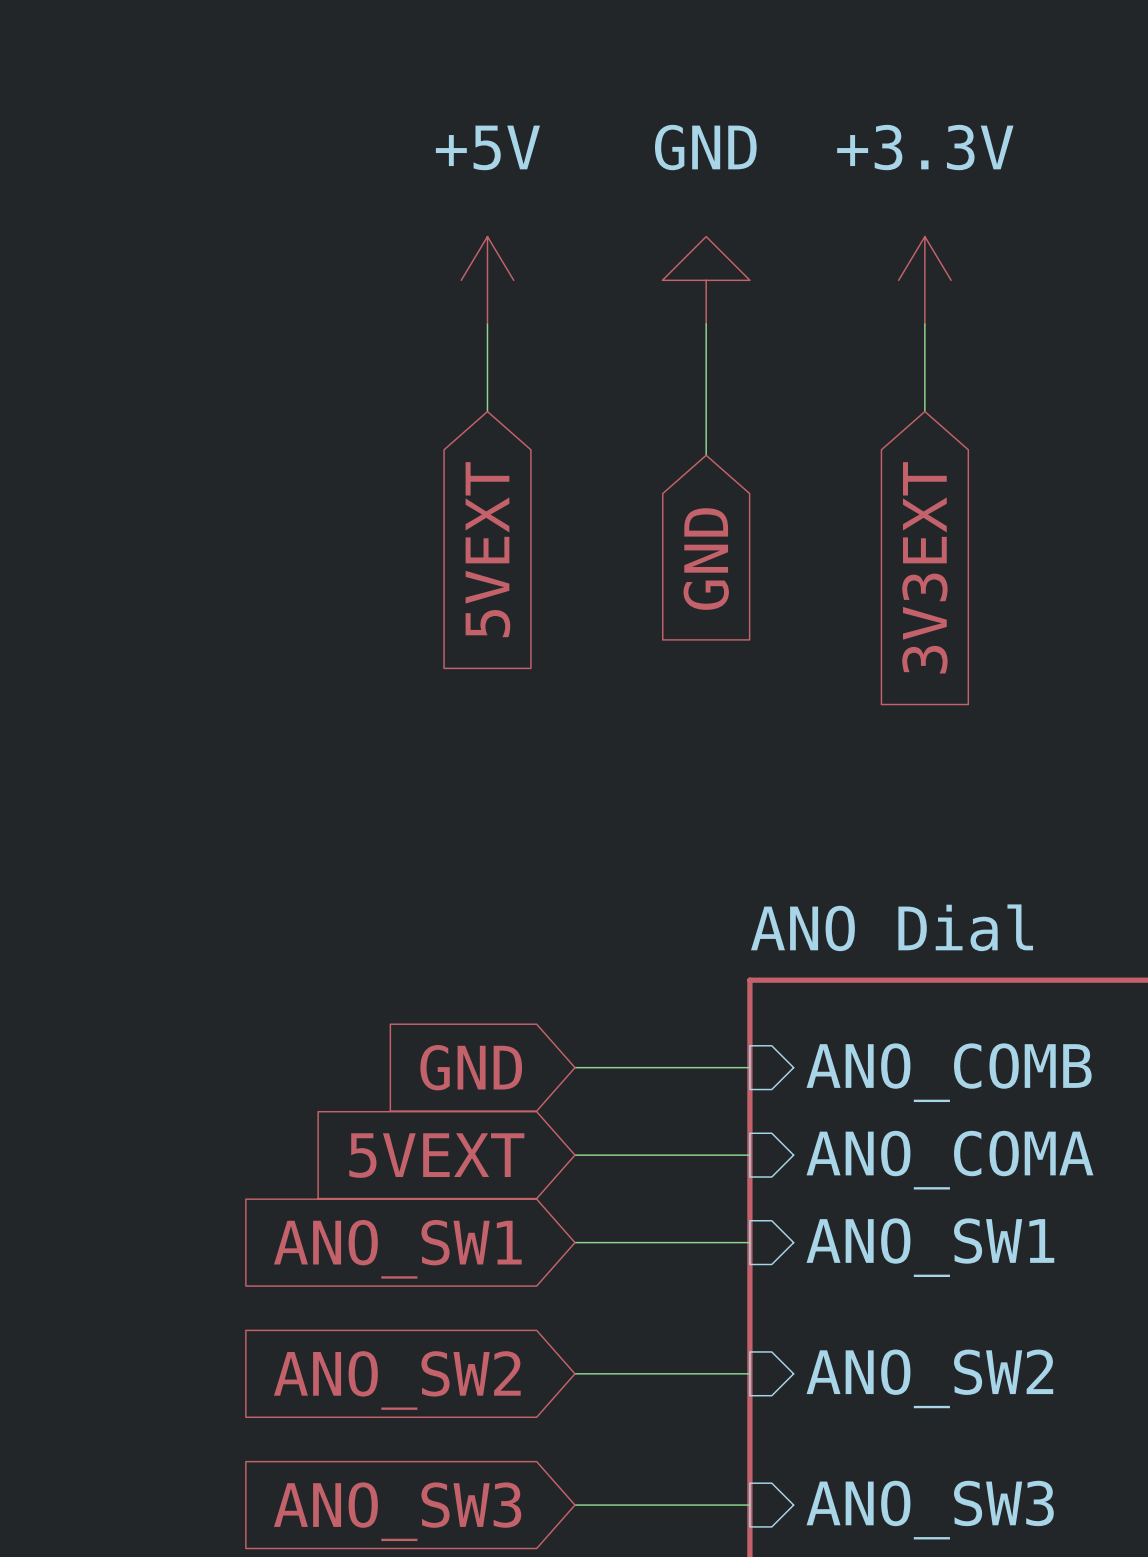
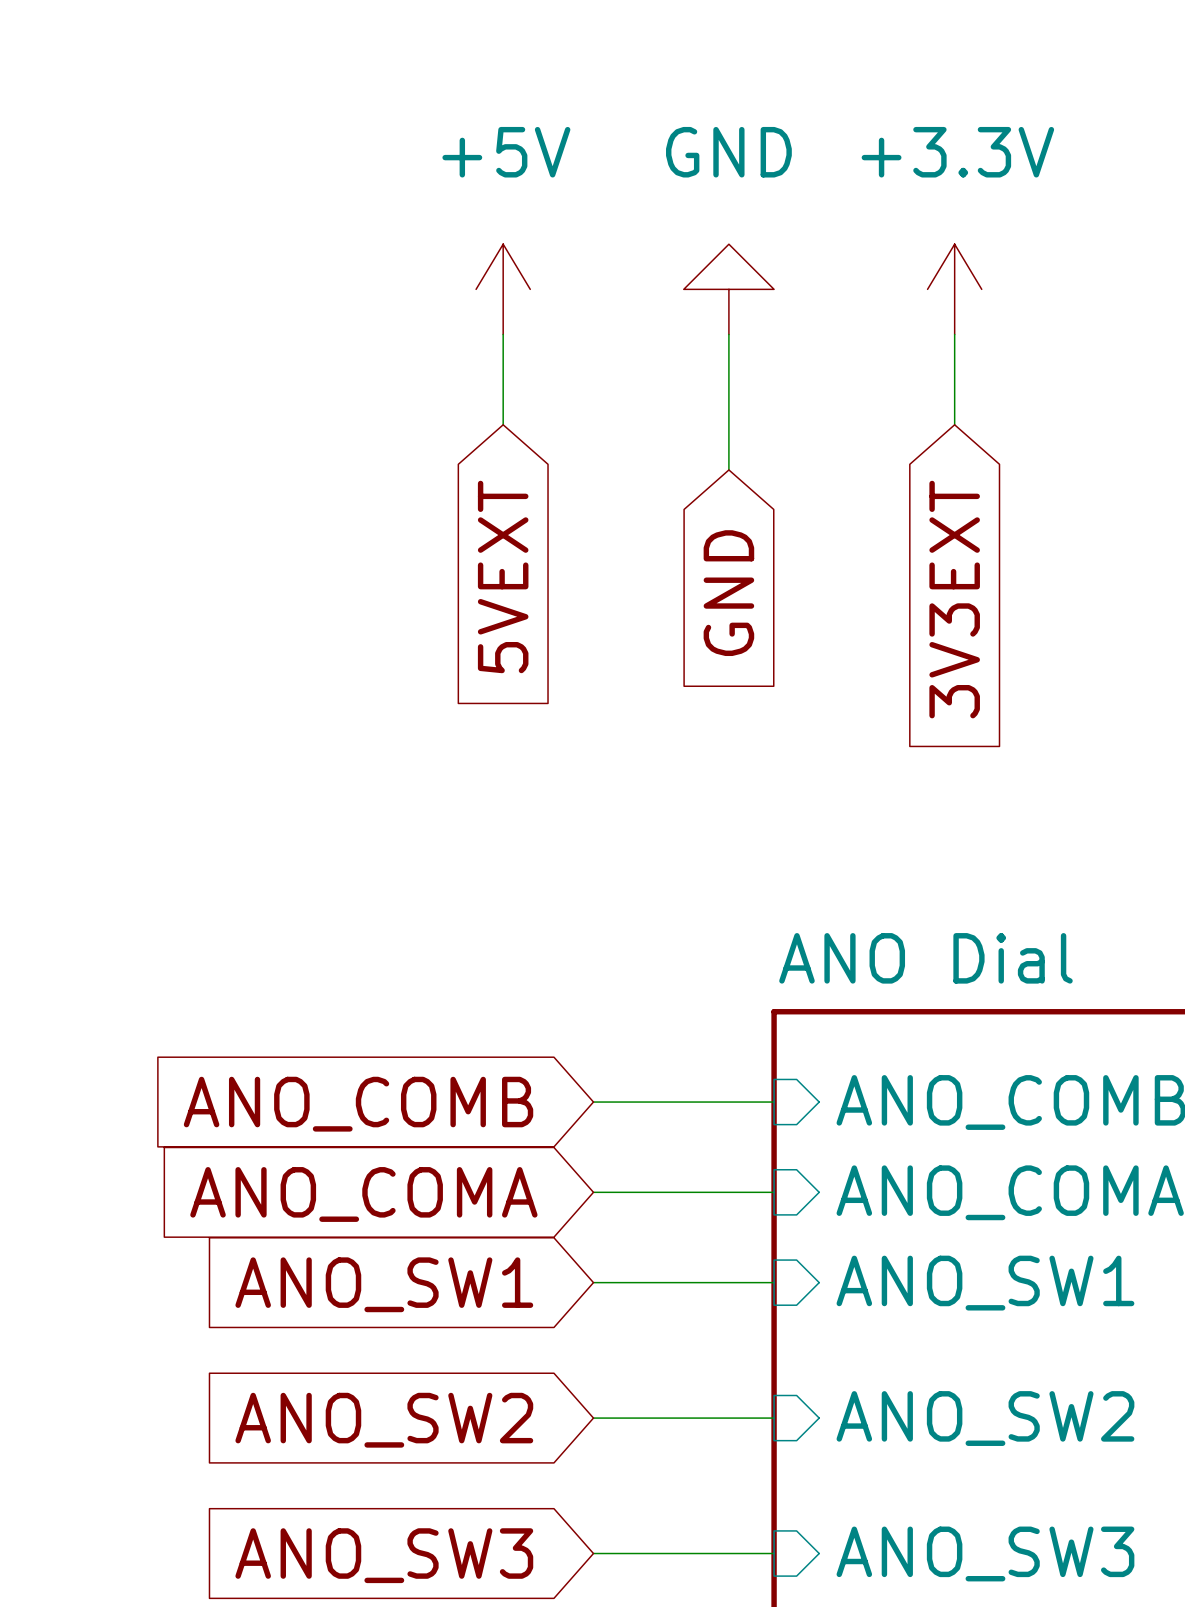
global label: GND (471, 1067) -> ANO_COMB (358, 1104)
global label: 5VEXT (436, 1155) -> ANO_COMA (363, 1194)

